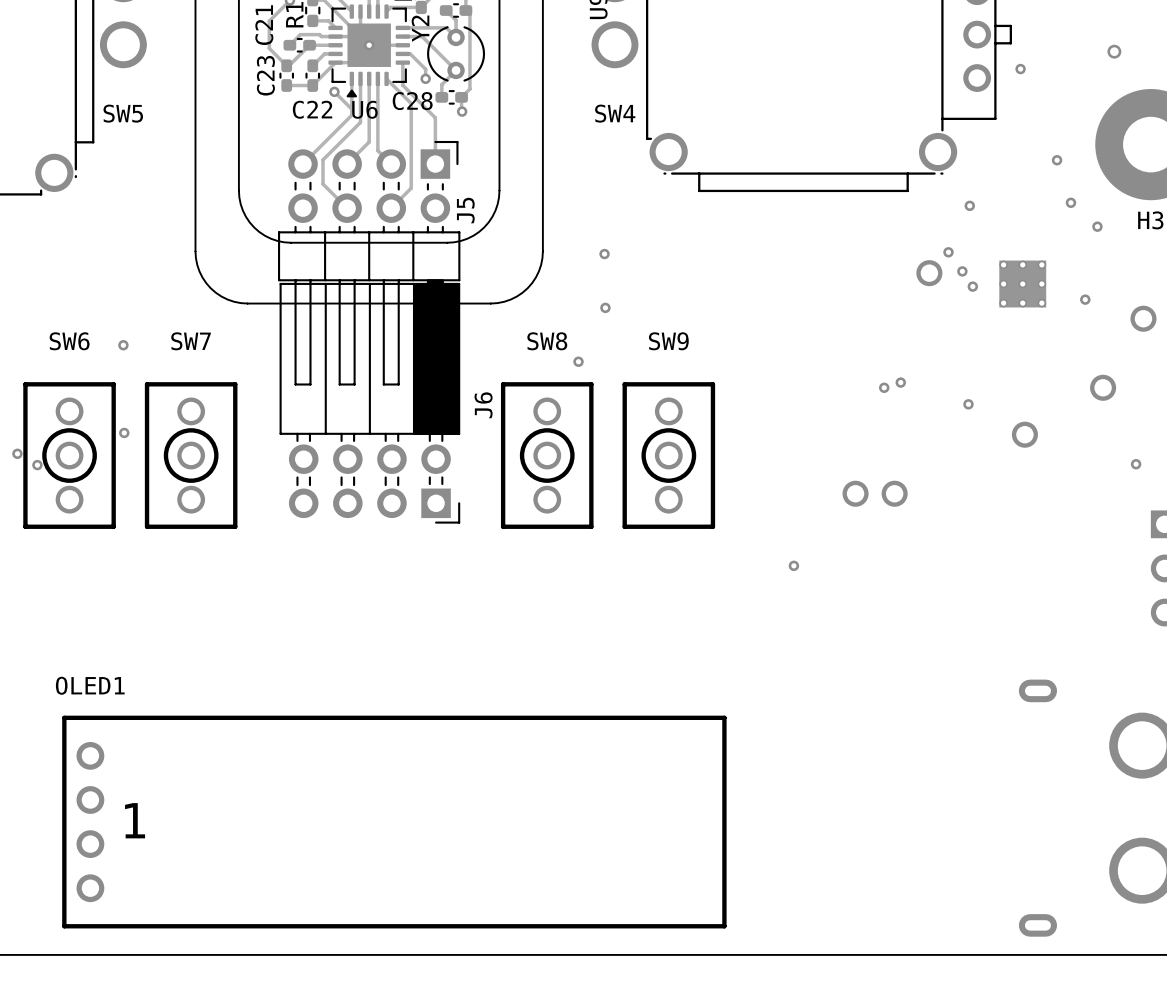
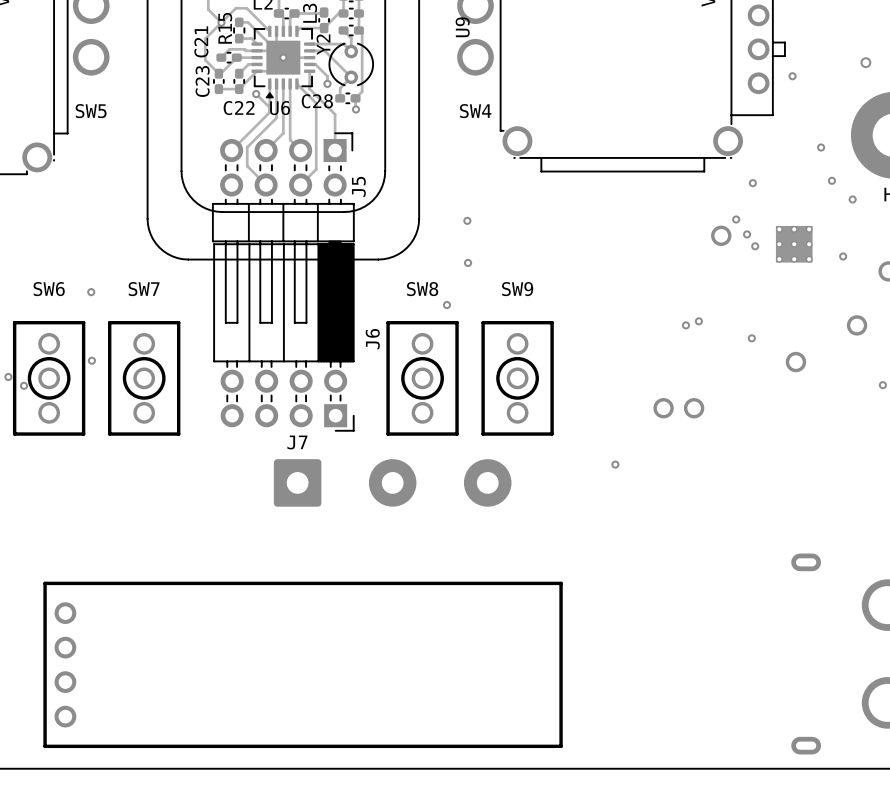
J7: none -> (392, 482)
OLED1 name: OLED1 (90, 685) -> none
OLED1 text: 1 (135, 820) -> none

